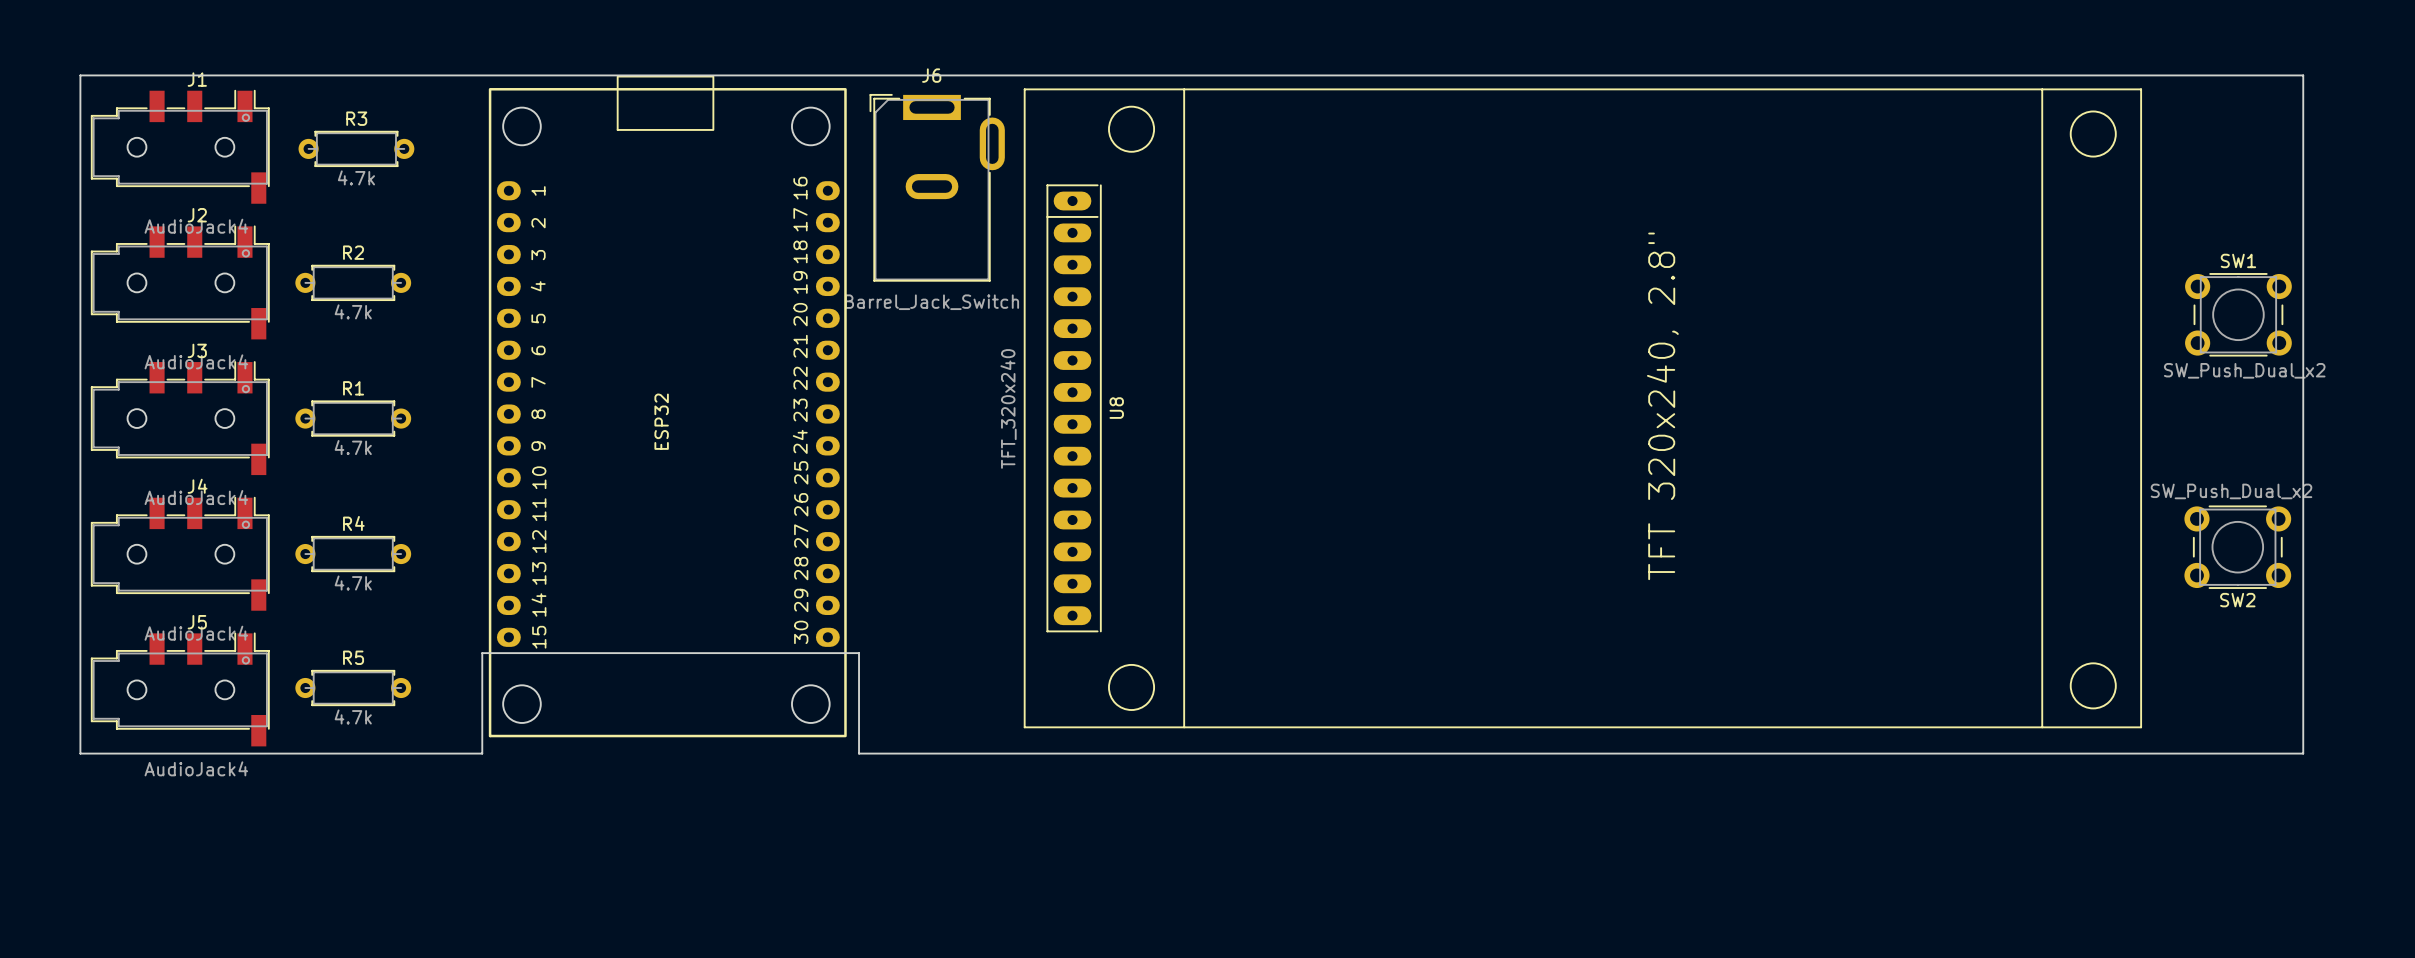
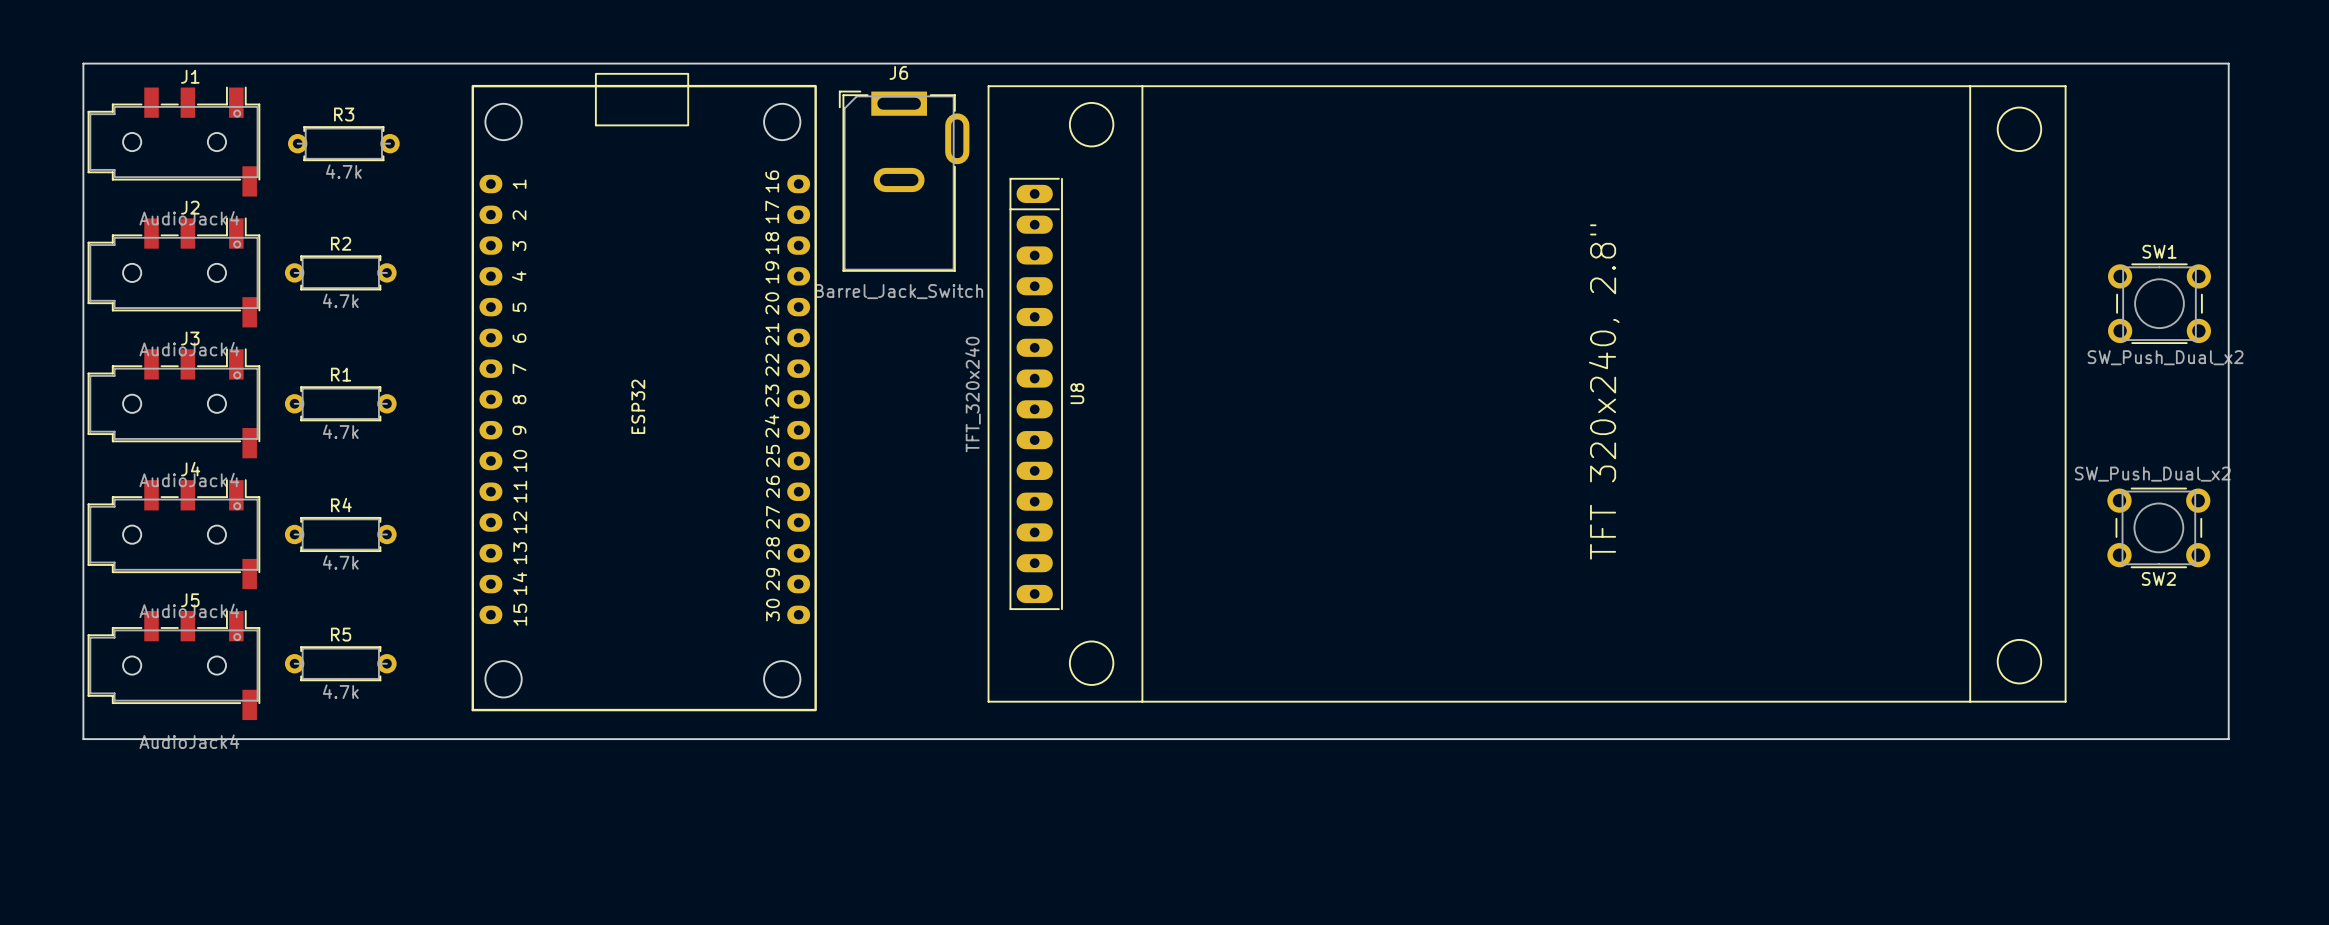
board edge: (80, 75) (2303, 75) (2303, 753) (859, 753) (859, 653) (482, 653) (482, 753) (80, 753) (80, 75) -> (83, 63) (83, 739) (2228, 739) (2228, 63) (83, 63)

